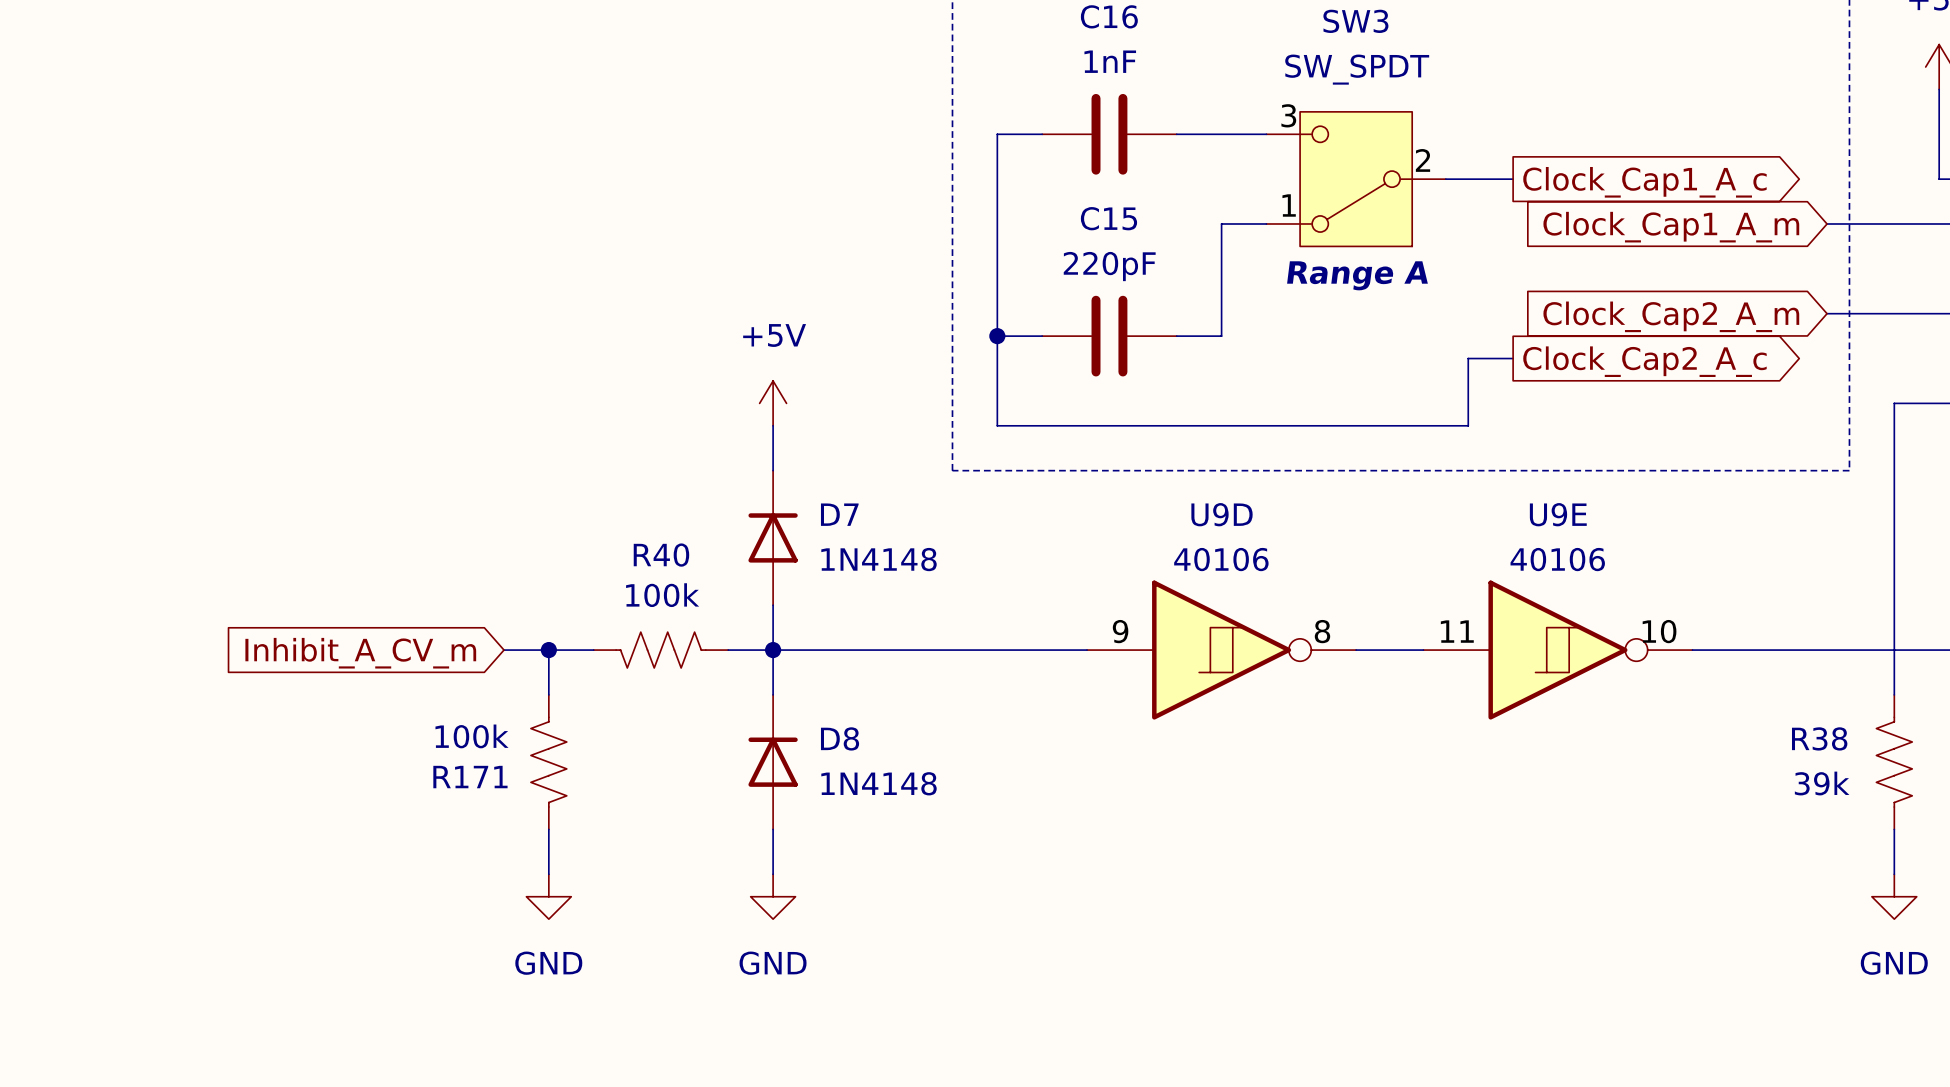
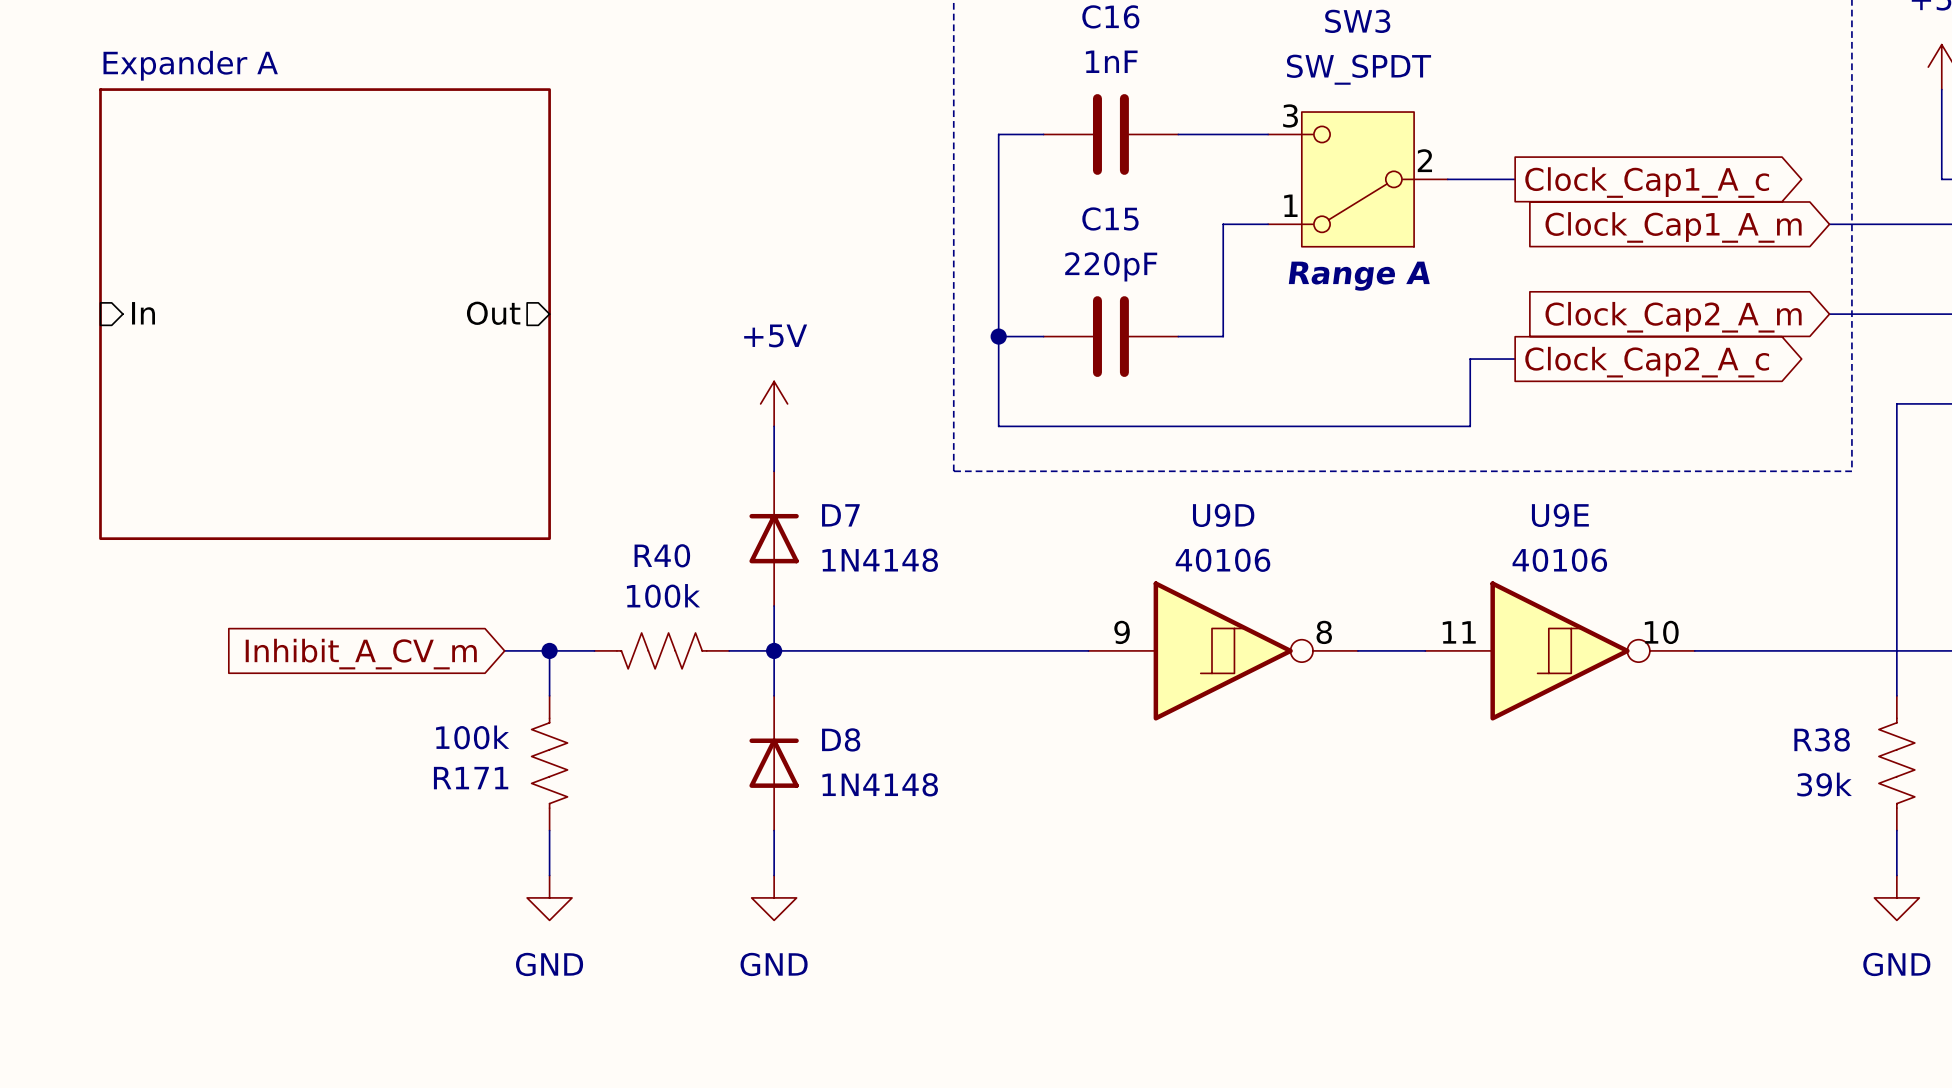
sheet pin: none -> In (143, 313)
sheet pin: none -> Out (493, 313)
sheet Expander A: none -> (325, 314)

